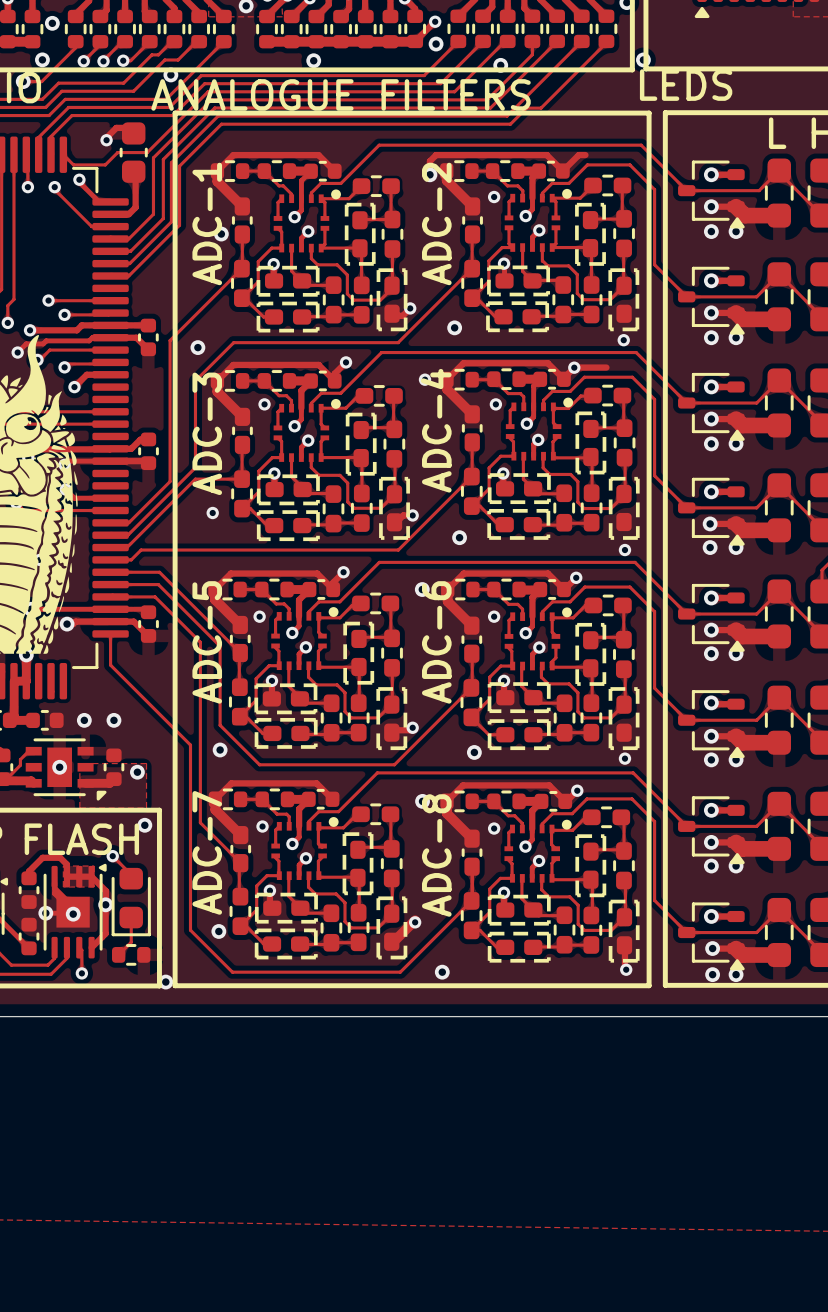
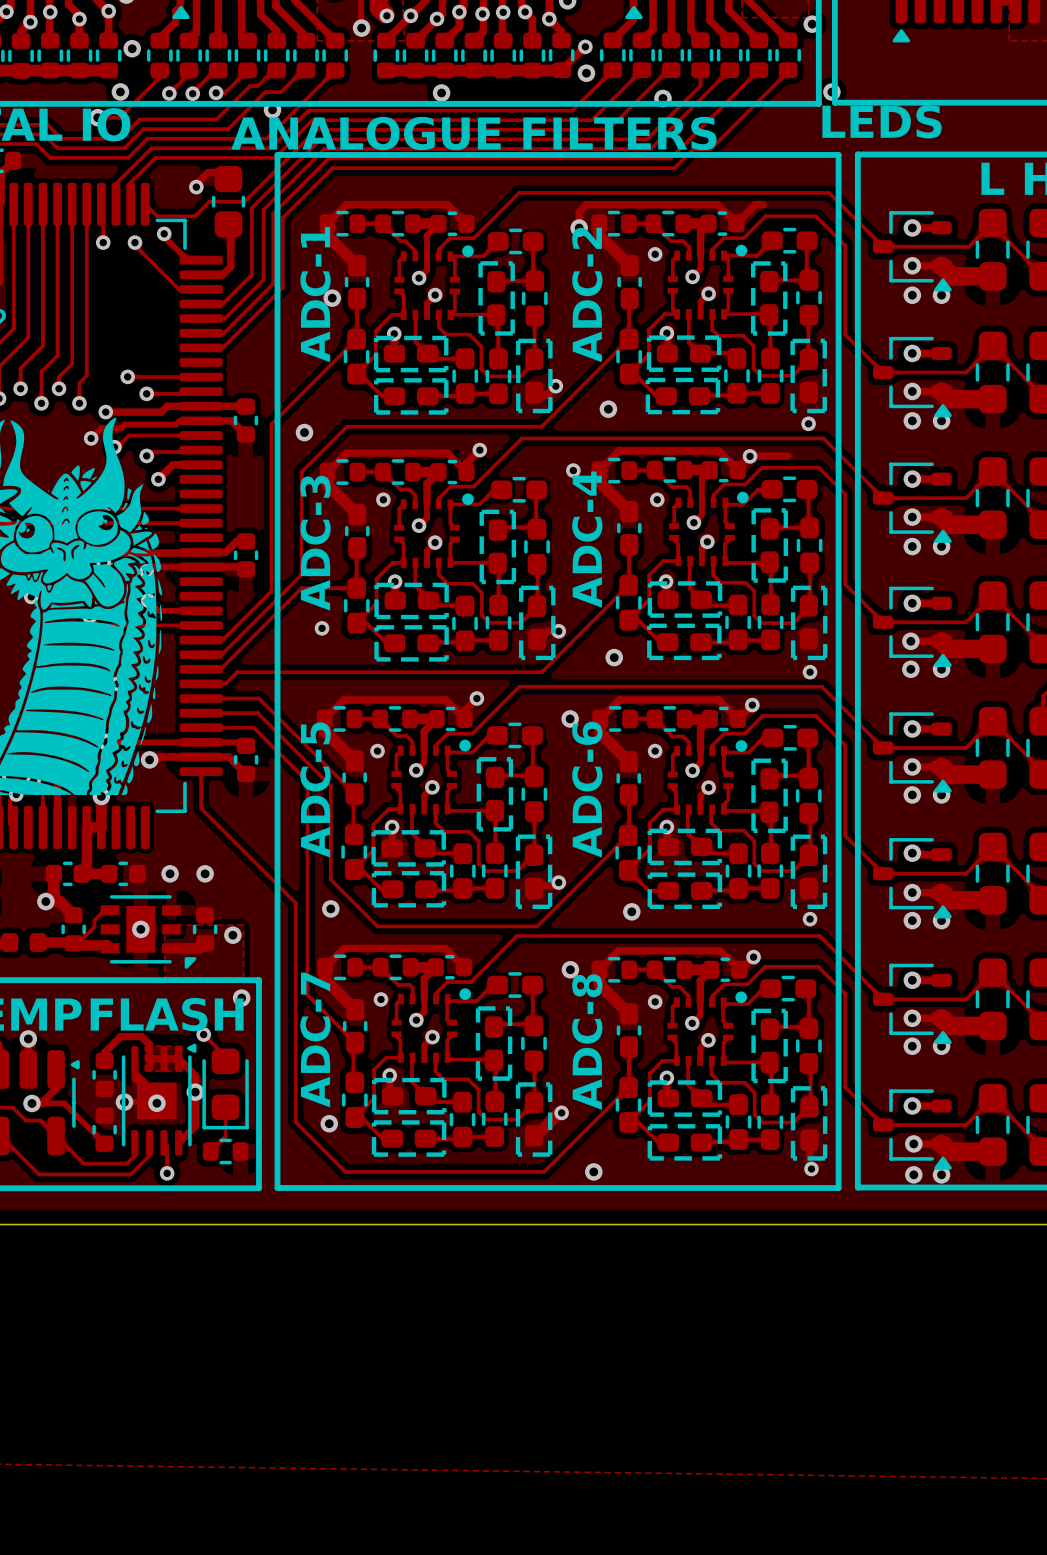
via: (165, 982) -> none

